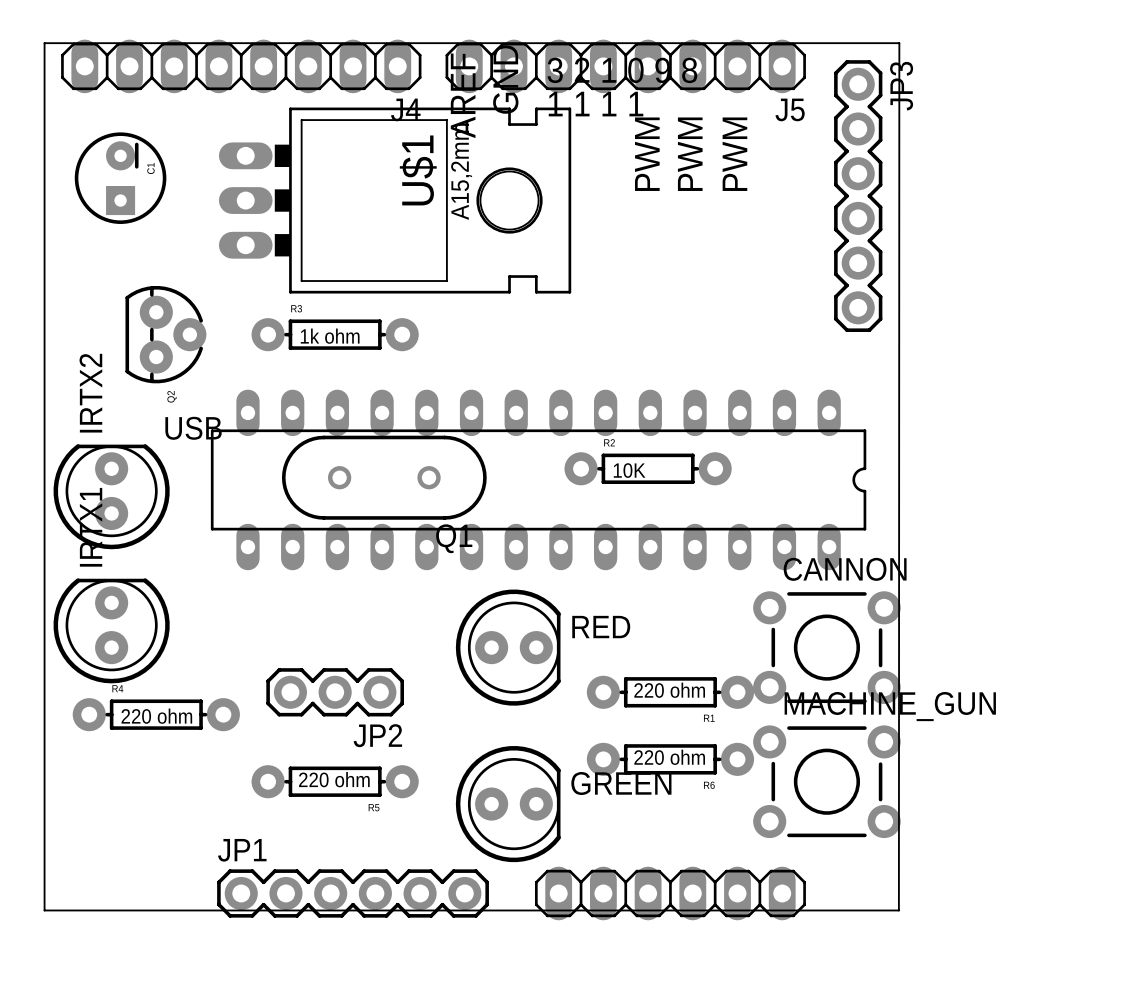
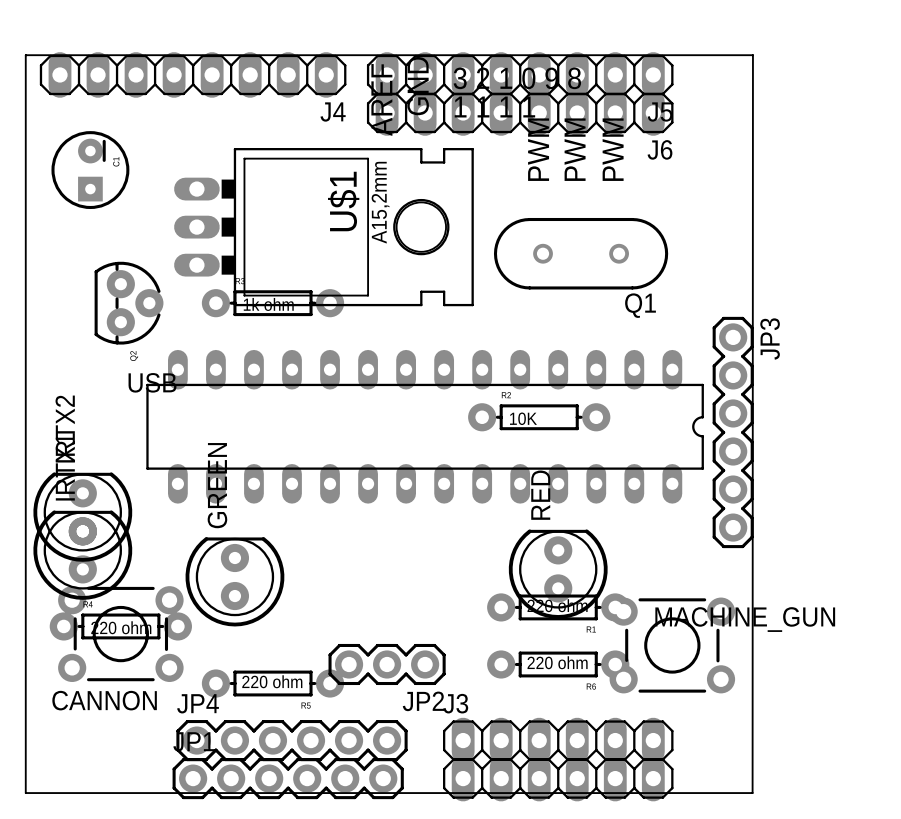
J6: none -> (520, 113)
JP3 position: (858, 196) -> (733, 432)
U$1 position: (395, 200) -> (323, 227)
Q1 position: (384, 477) -> (581, 253)
part position: (538, 479) -> (425, 426)
IRTX2 position: (111, 496) -> (82, 517)
RED rotation: 0° (508, 647) -> 90° counterclockwise (558, 574)
RED position: (508, 647) -> (558, 574)
CANNON: (826, 647) -> none
JP2 position: (335, 692) -> (387, 664)
CANNON: none -> (120, 634)
MACHINE_GUN position: (826, 781) -> (672, 645)
GREEN rotation: 0° (508, 804) -> 90° counterclockwise (234, 581)
GREEN position: (508, 804) -> (234, 581)
JP4: none -> (292, 740)
J3: none -> (558, 740)

